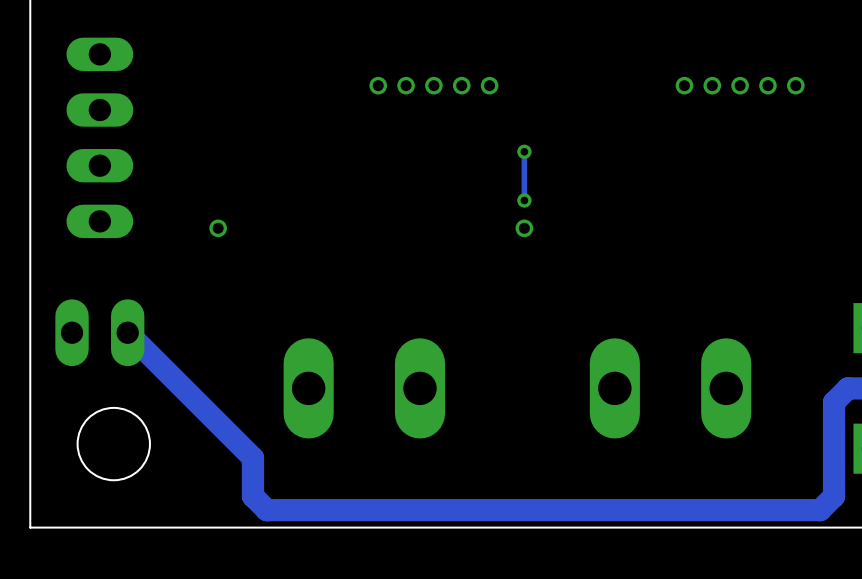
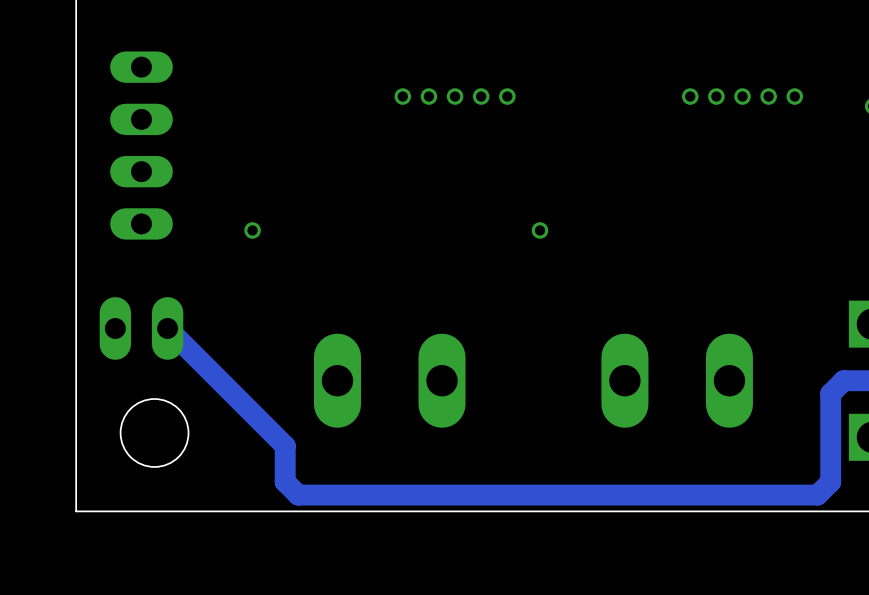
track: (524, 151) (524, 200) -> none
via: (524, 151) -> none
via: (524, 200) -> none

